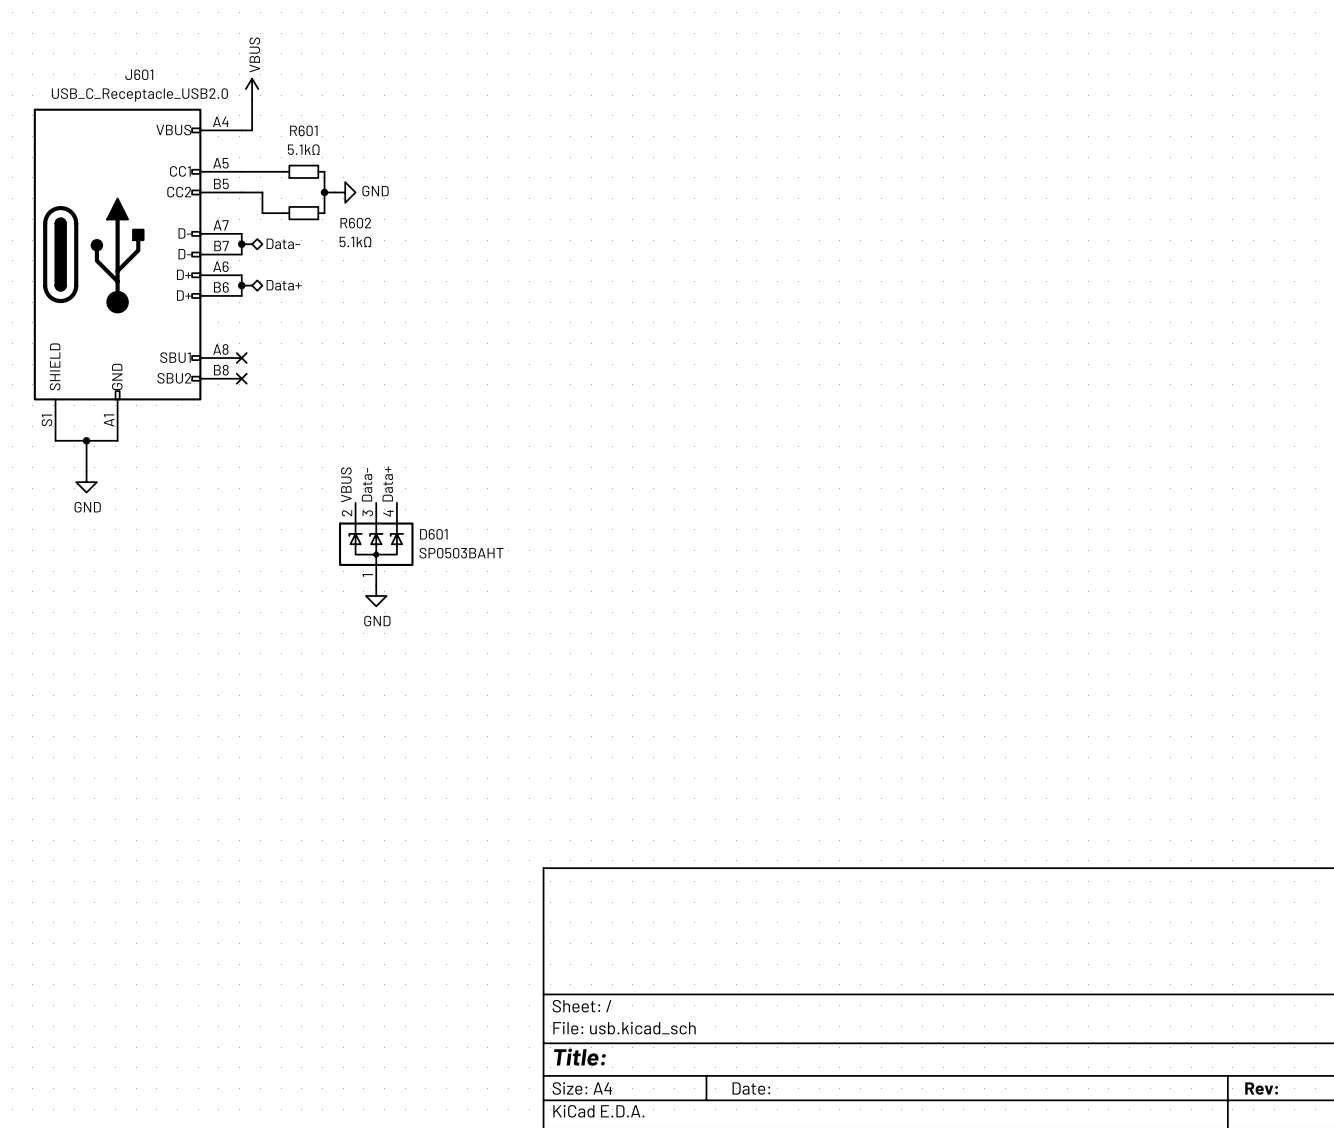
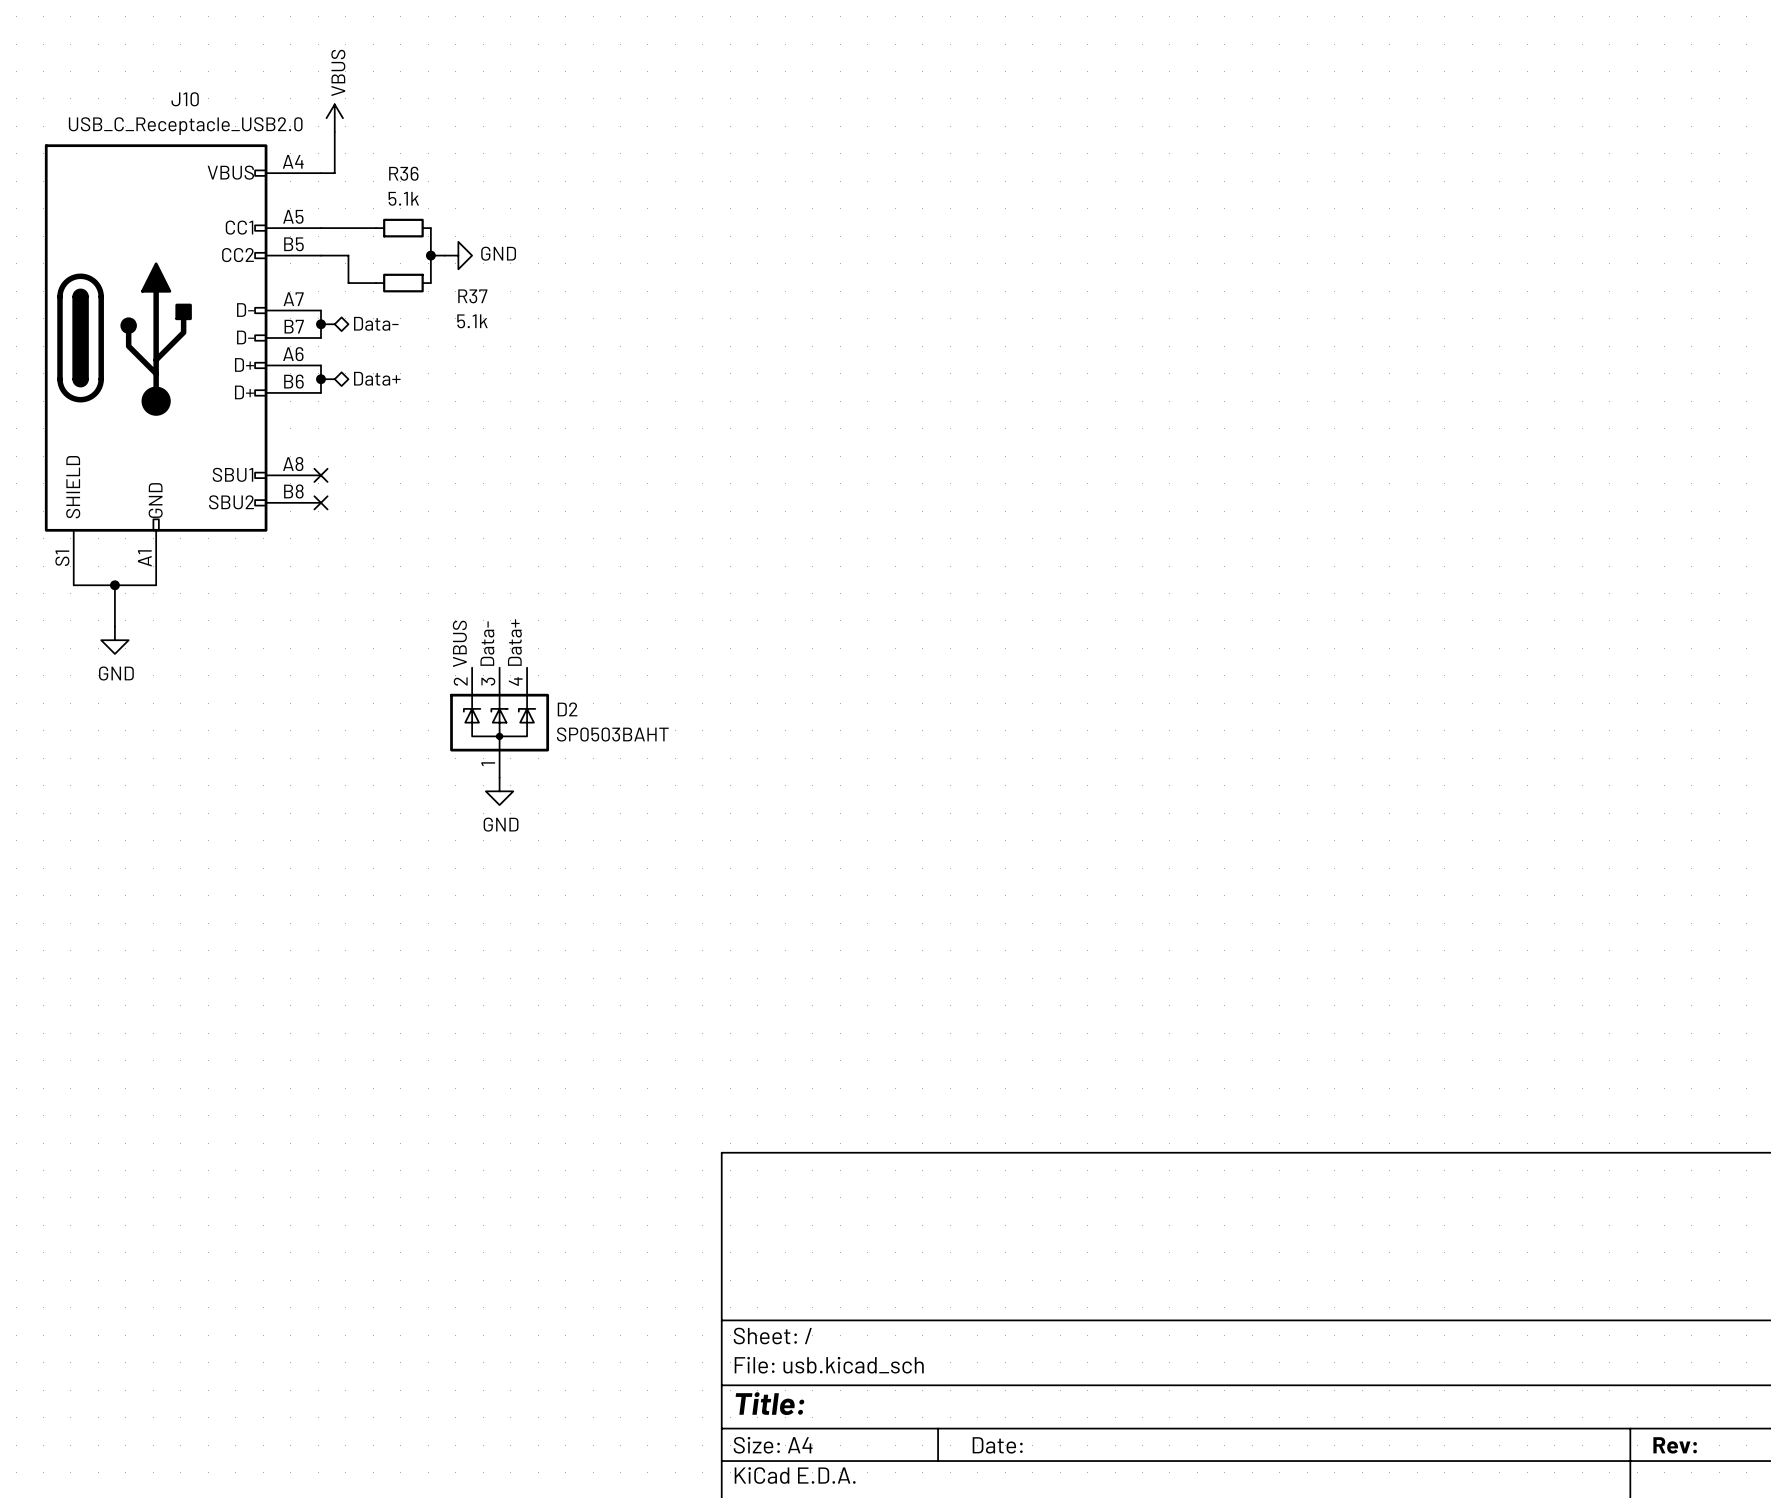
J601 name: J601 (139, 74) -> J10 (185, 99)
R601 name: R601 (303, 130) -> R36 (403, 173)
R601 value: 5.1kΩ (303, 149) -> 5.1k (403, 198)
R602 name: R602 (355, 223) -> R37 (472, 296)
R602 value: 5.1kΩ (355, 241) -> 5.1k (472, 321)
D601 name: D601 (433, 534) -> D2 (567, 709)

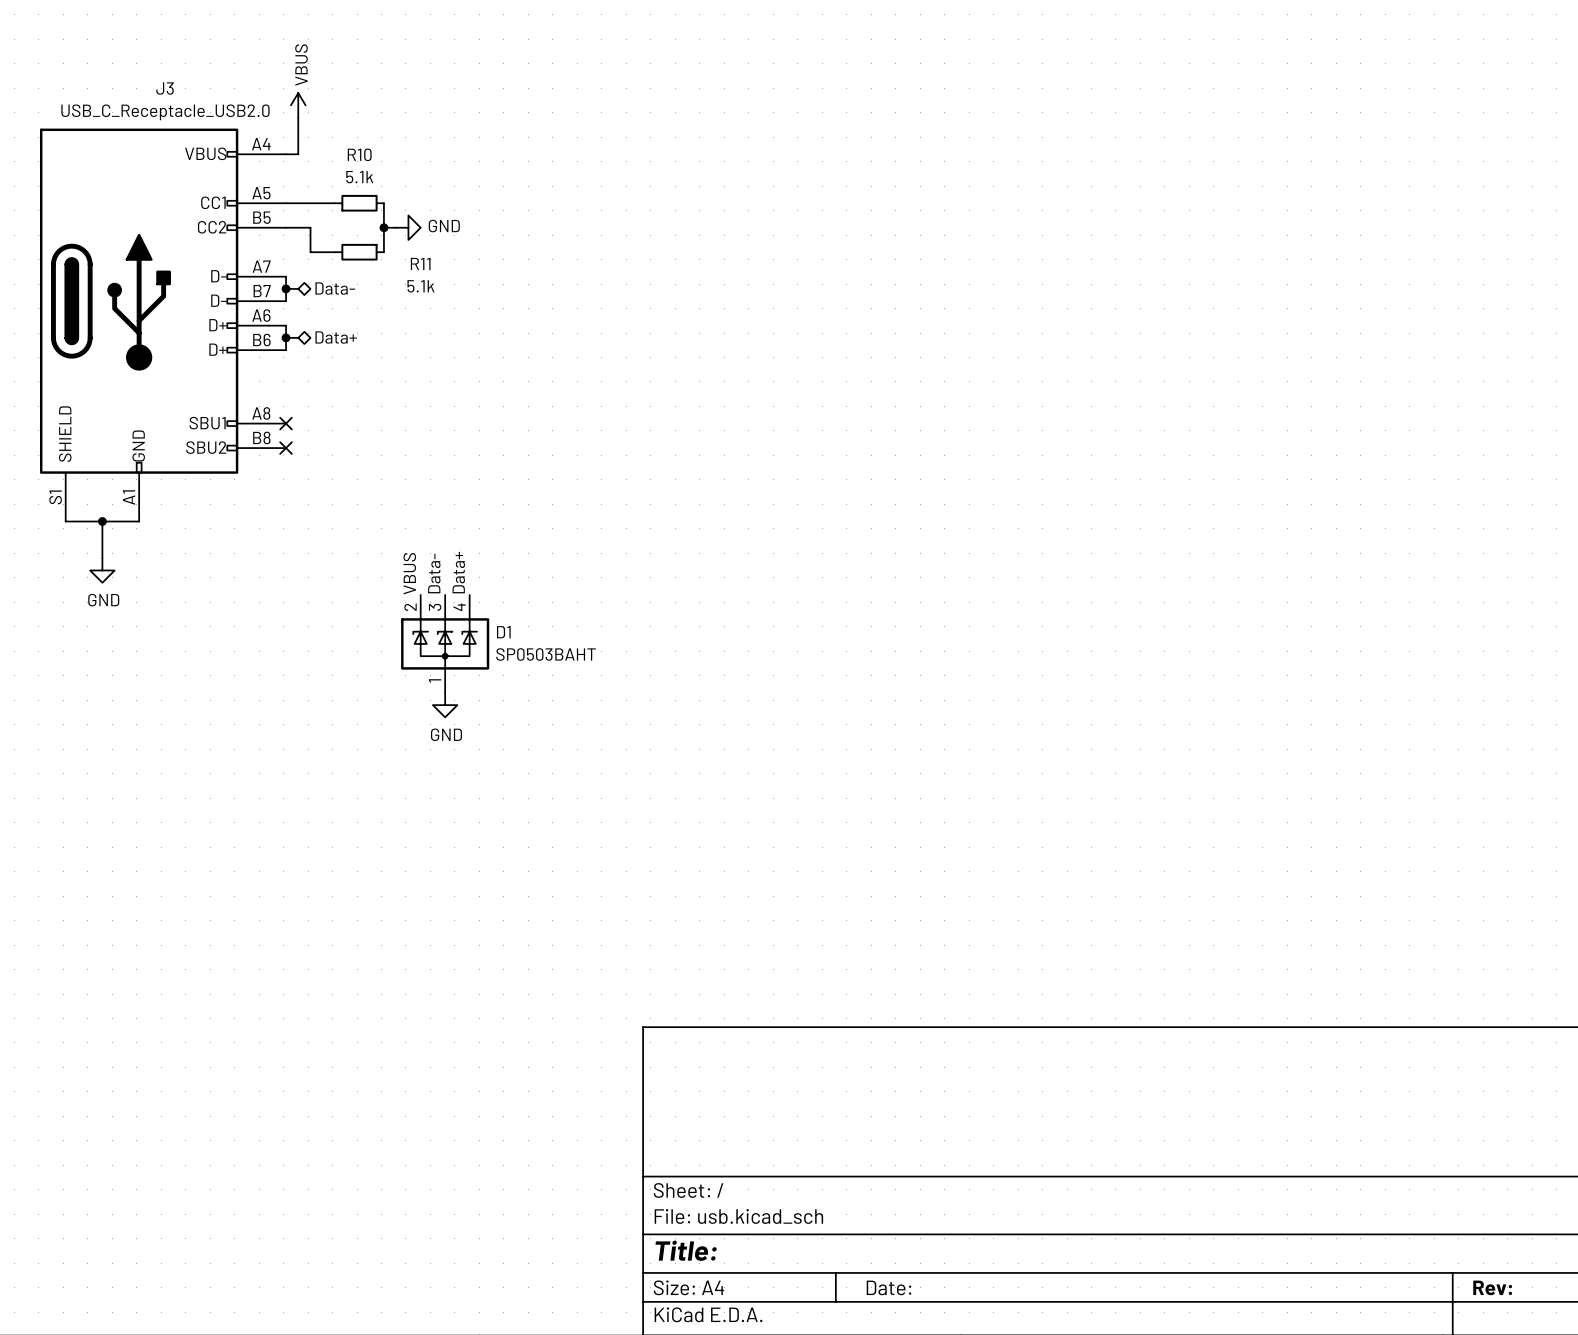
J10 name: J10 (185, 99) -> J3 (165, 88)
R36 name: R36 (403, 173) -> R10 (359, 154)
R37 name: R37 (472, 296) -> R11 (420, 263)
D2 name: D2 (567, 709) -> D1 (503, 632)

